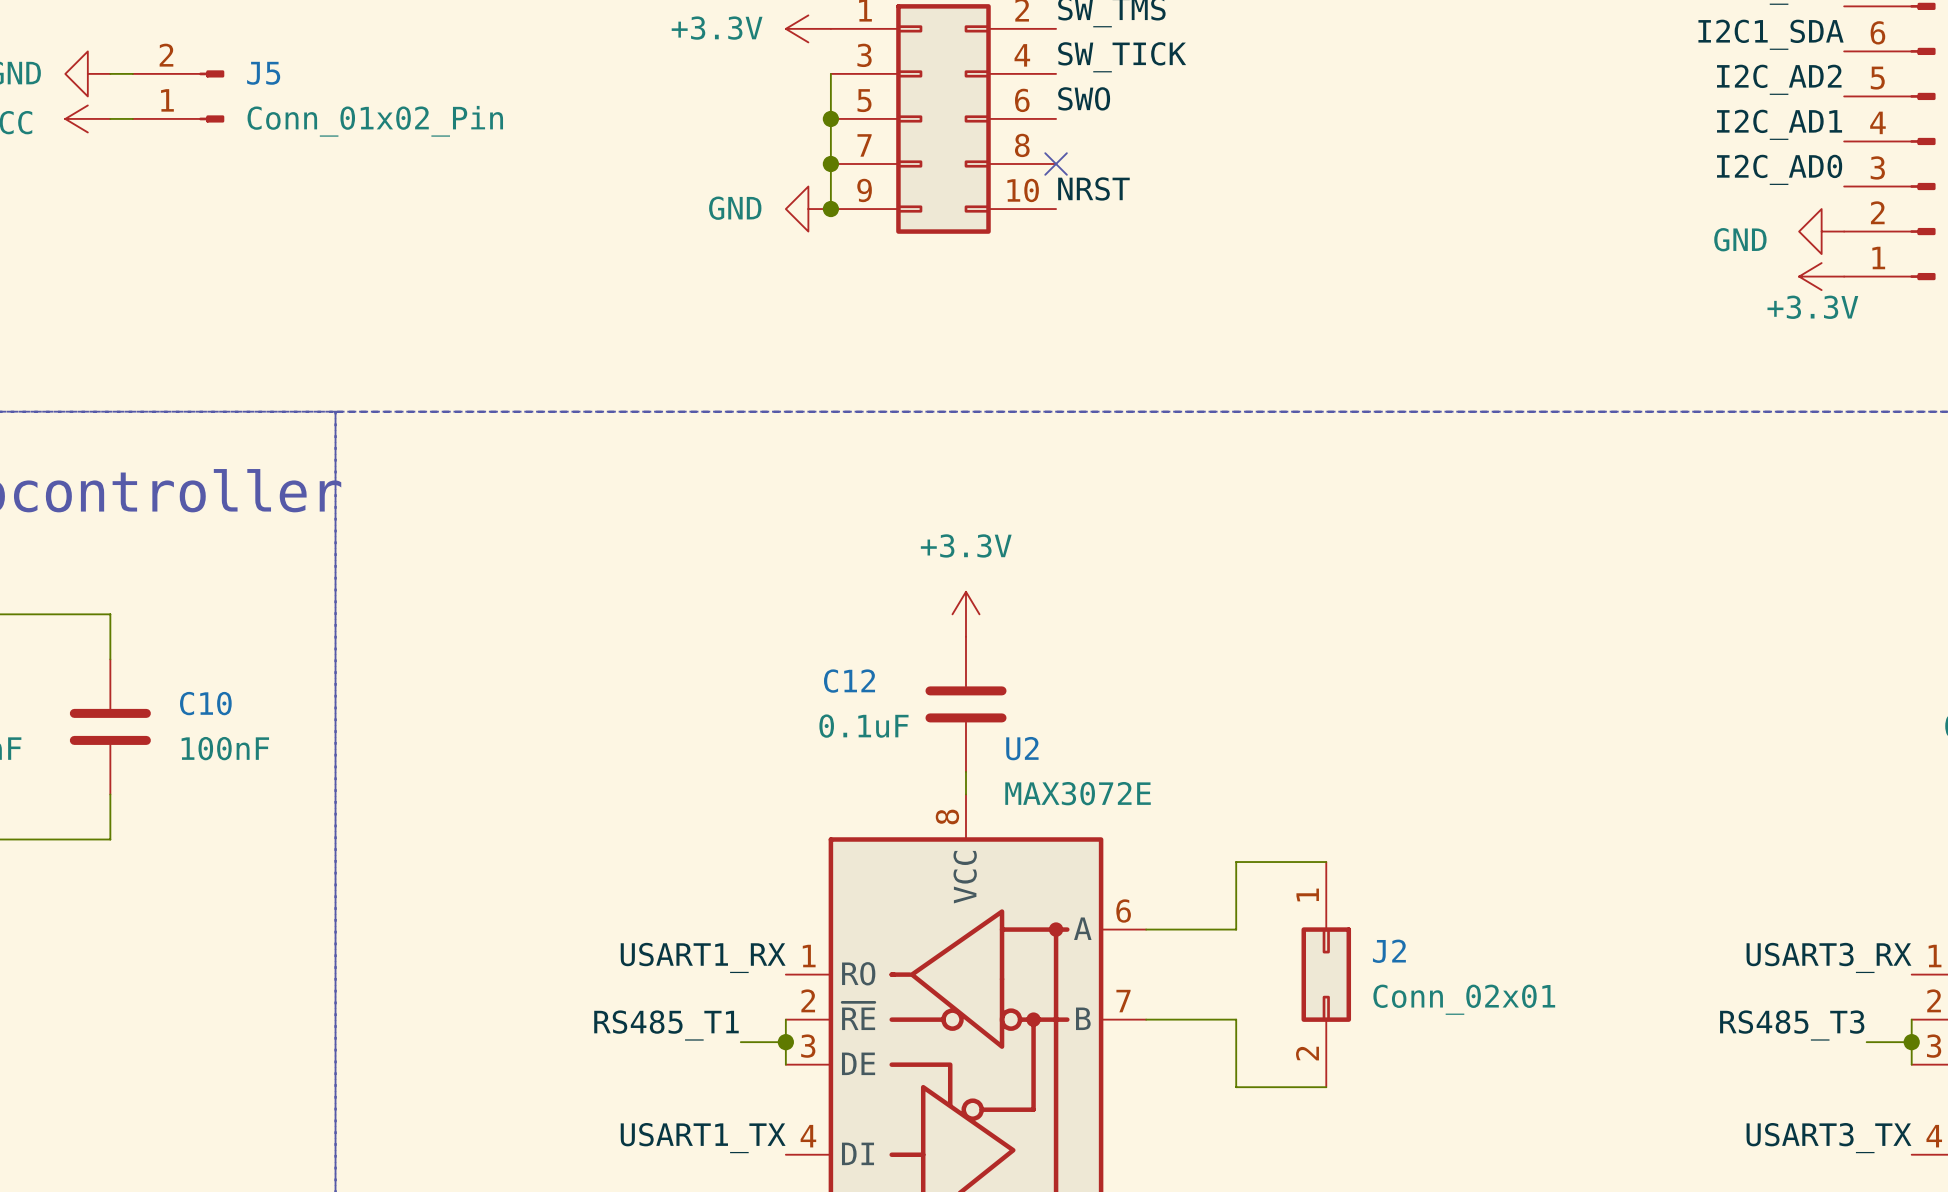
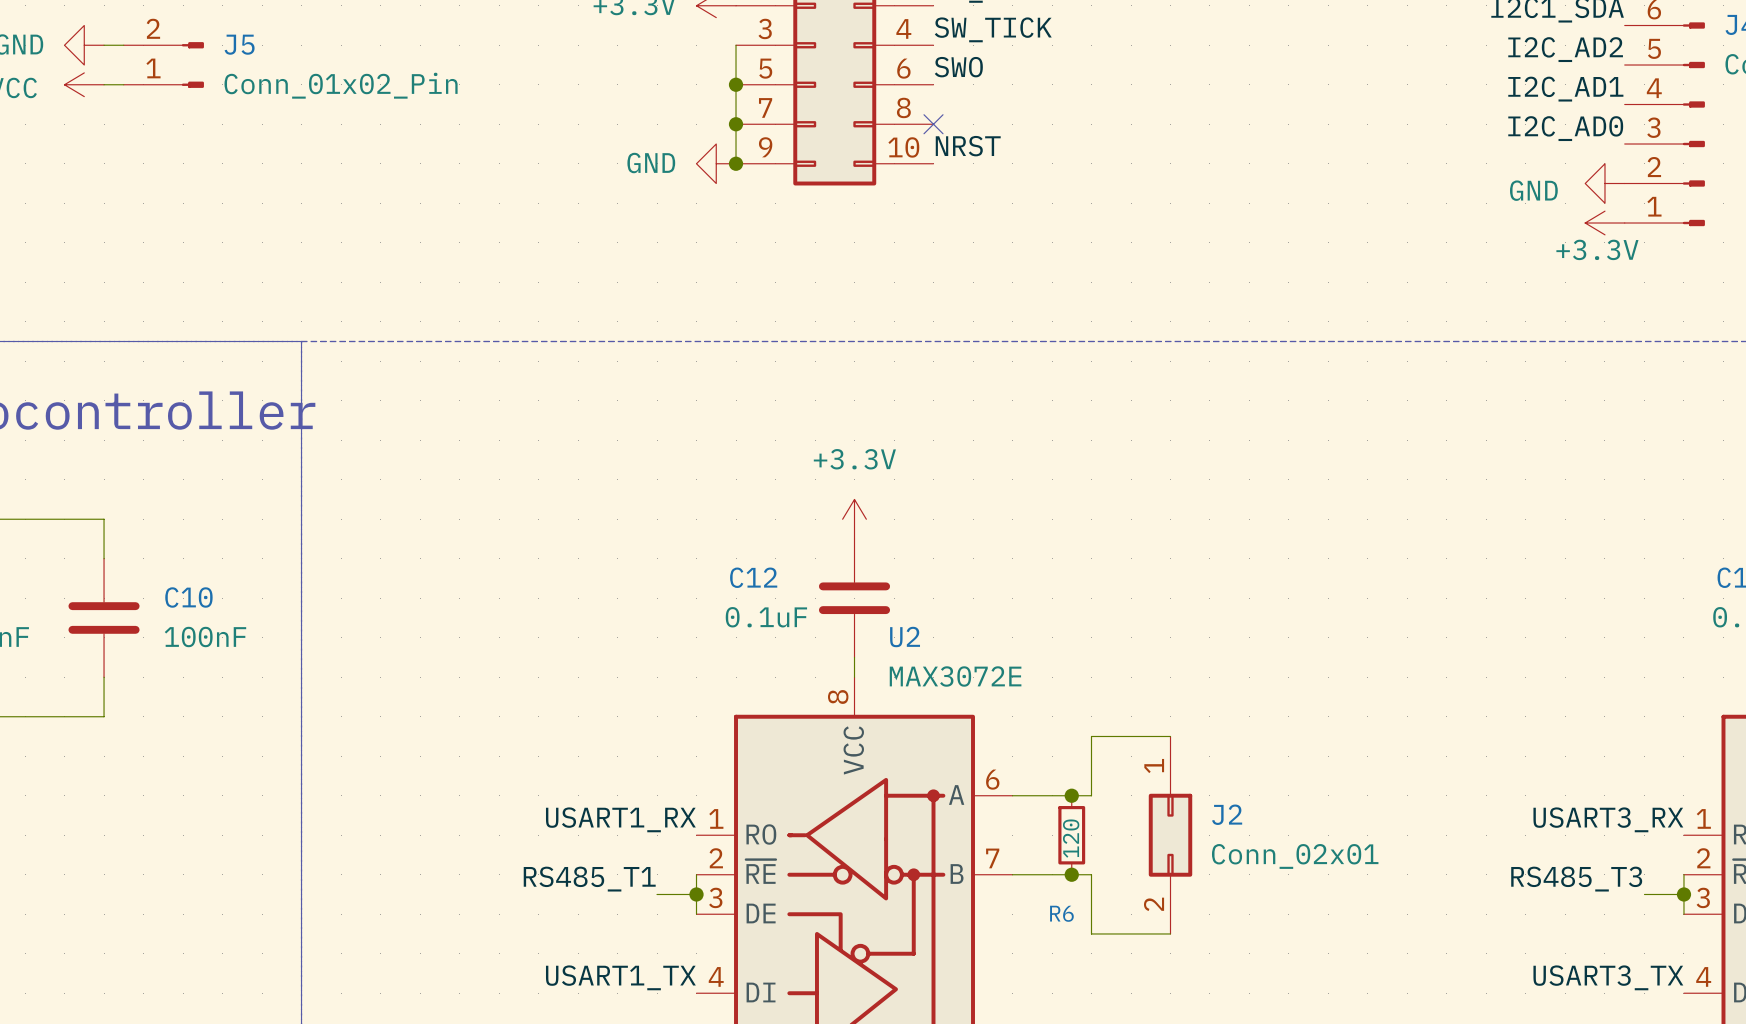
junction: none -> (1071, 795)
R6: none -> 120 (1071, 835)
junction: none -> (1071, 874)

